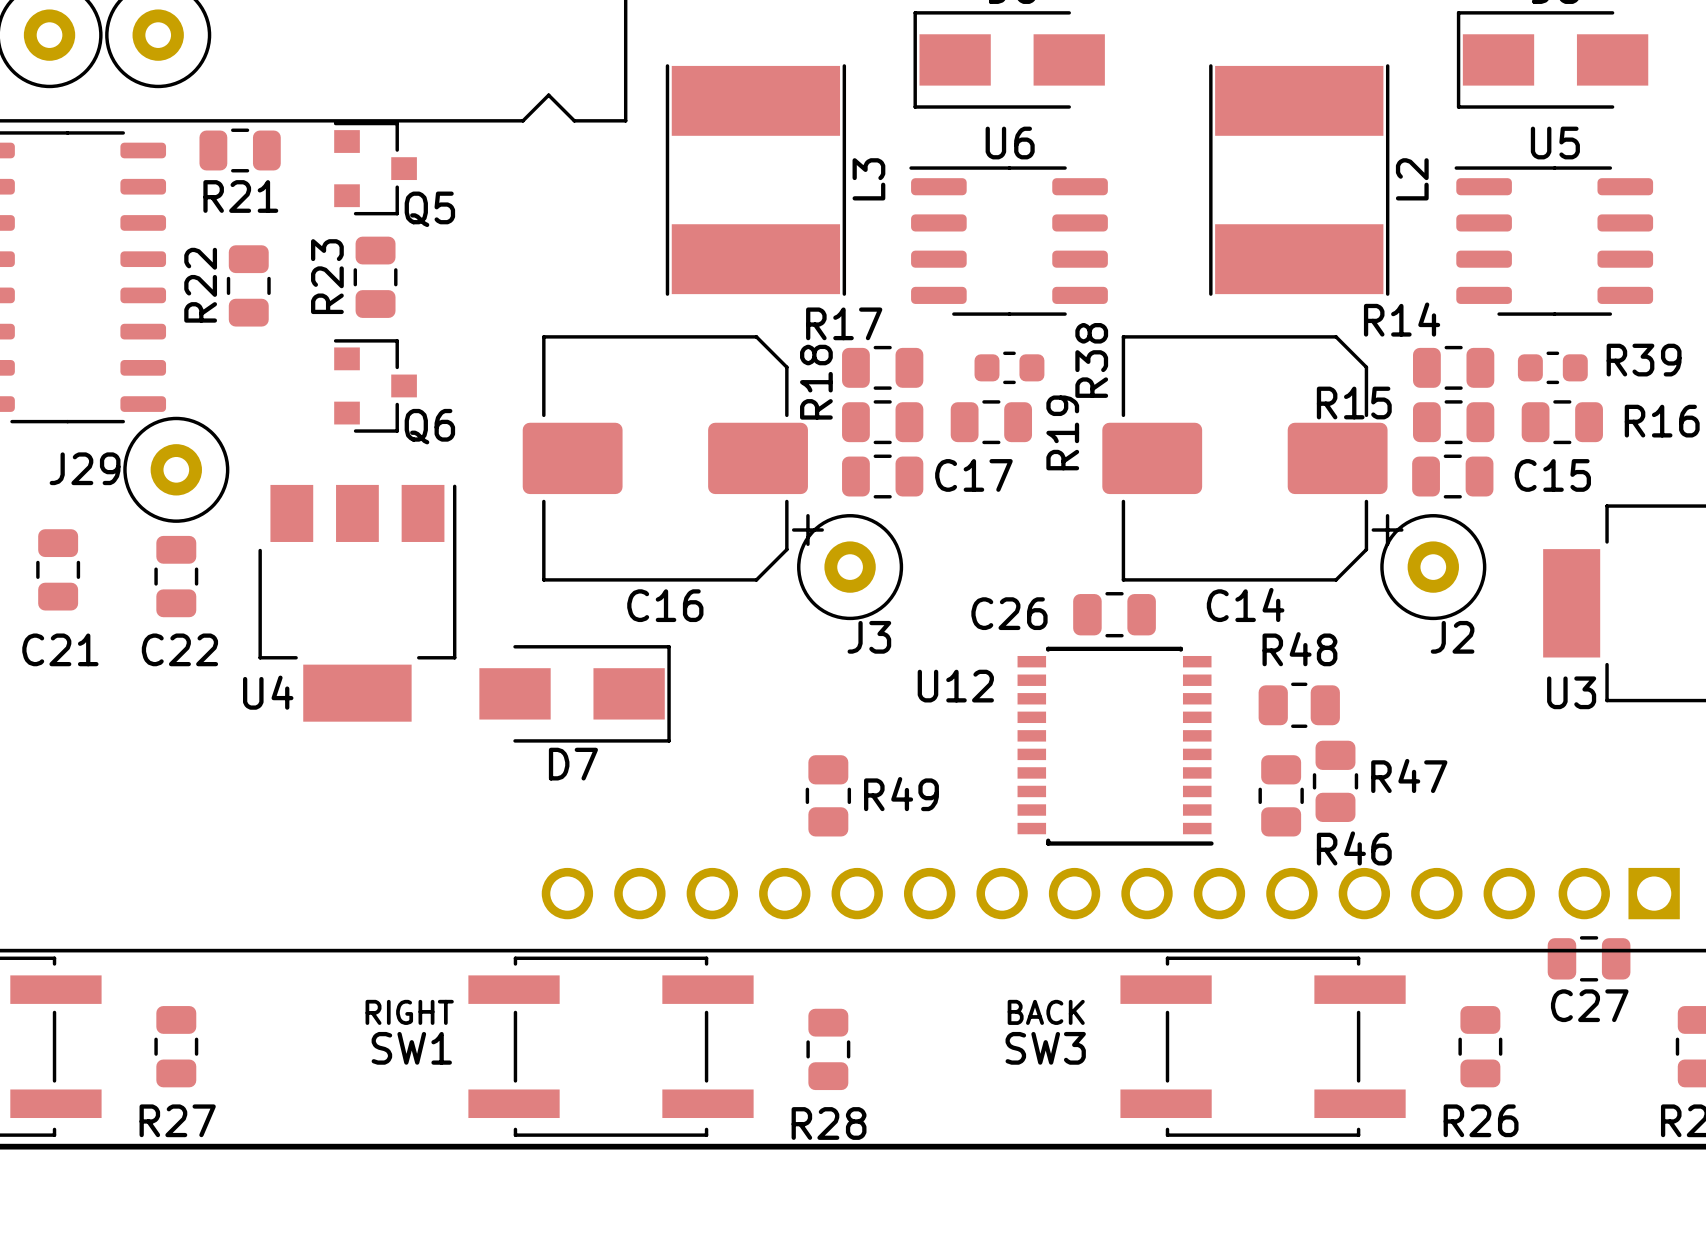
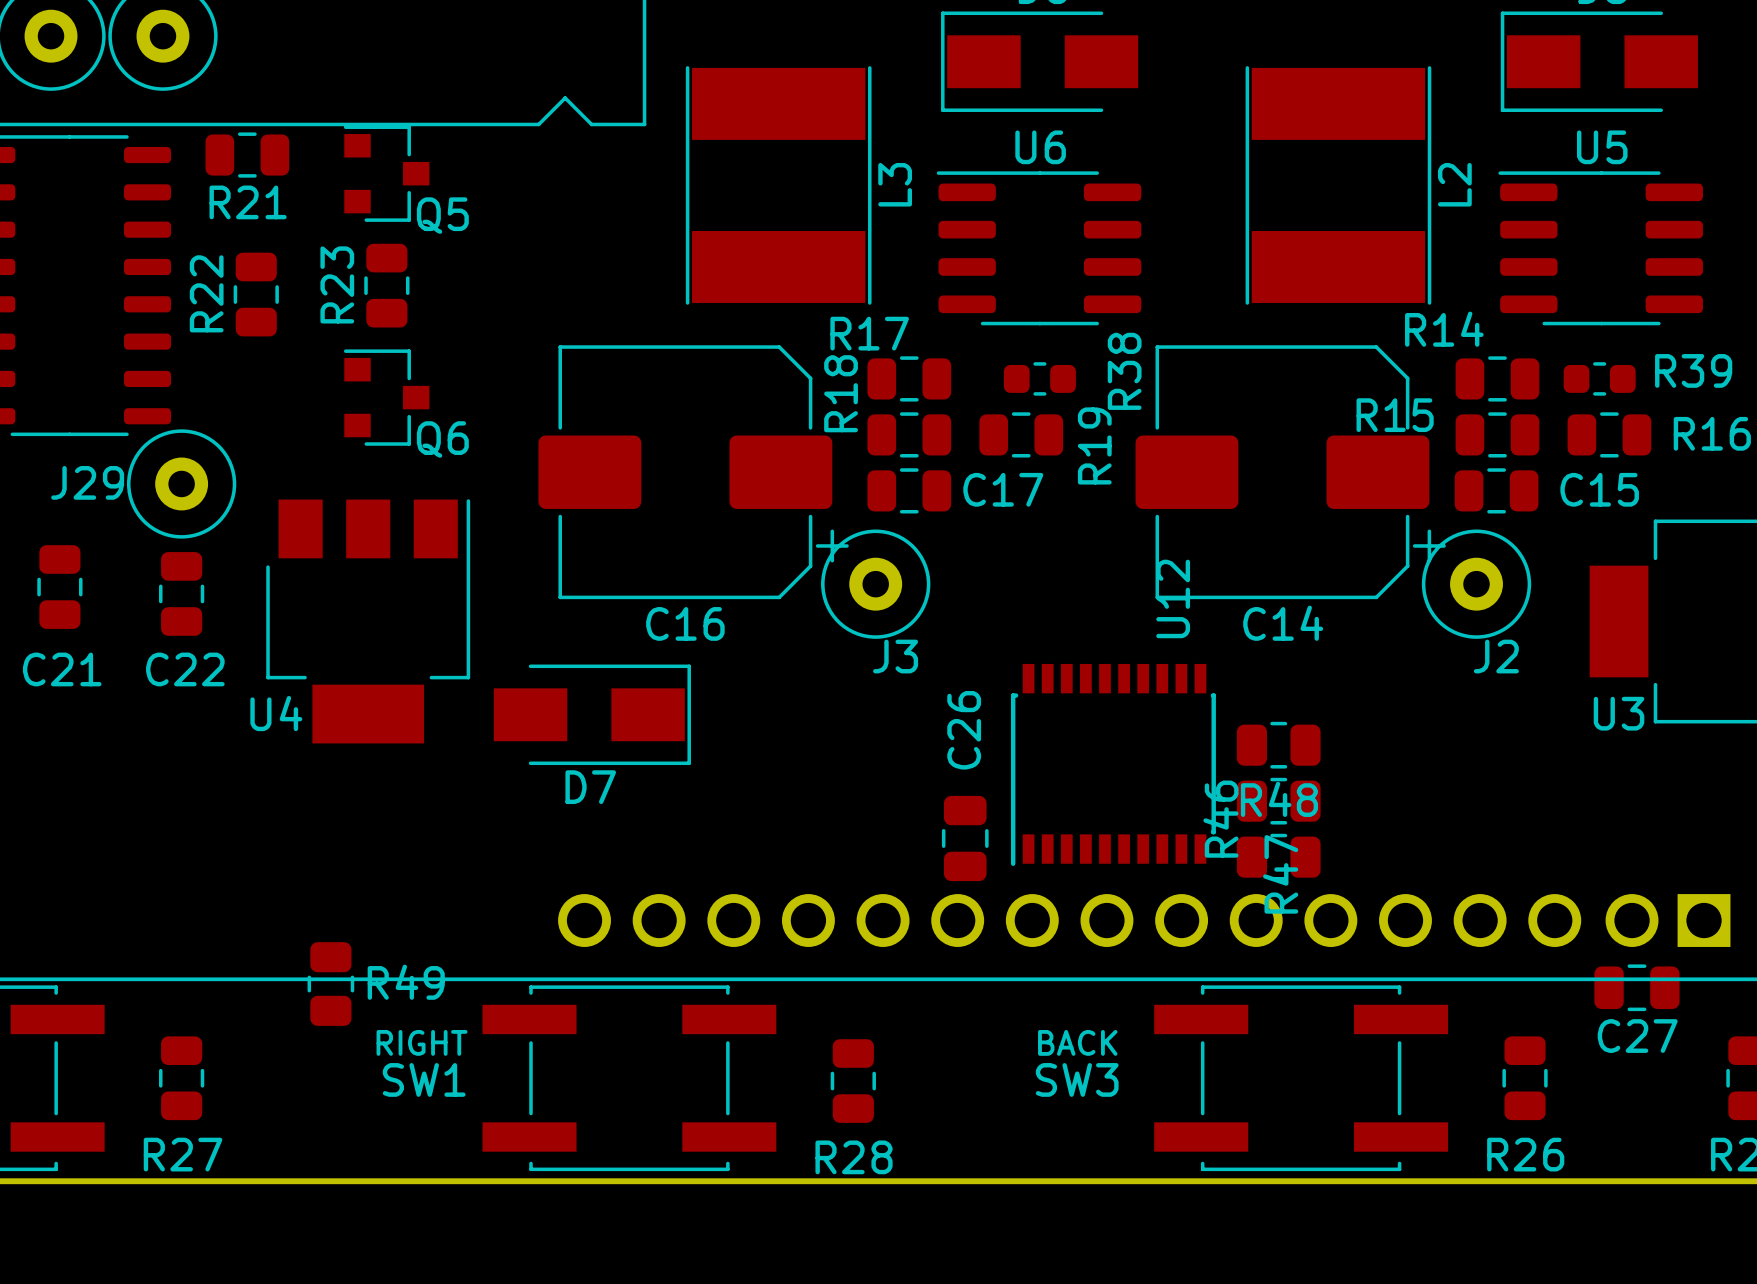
C26 rotation: 0° (1114, 614) -> 90° clockwise (965, 838)
C26 position: (1114, 614) -> (965, 838)
R48 position: (1299, 705) -> (1278, 857)
U12 rotation: 0° (1115, 746) -> 90° clockwise (1113, 764)
R47 rotation: 0° (1335, 781) -> 90° clockwise (1278, 801)
R47 position: (1335, 781) -> (1278, 801)
R49 position: (828, 795) -> (330, 984)
R46 rotation: 0° (1281, 795) -> 90° clockwise (1278, 745)
R46 position: (1281, 795) -> (1278, 745)

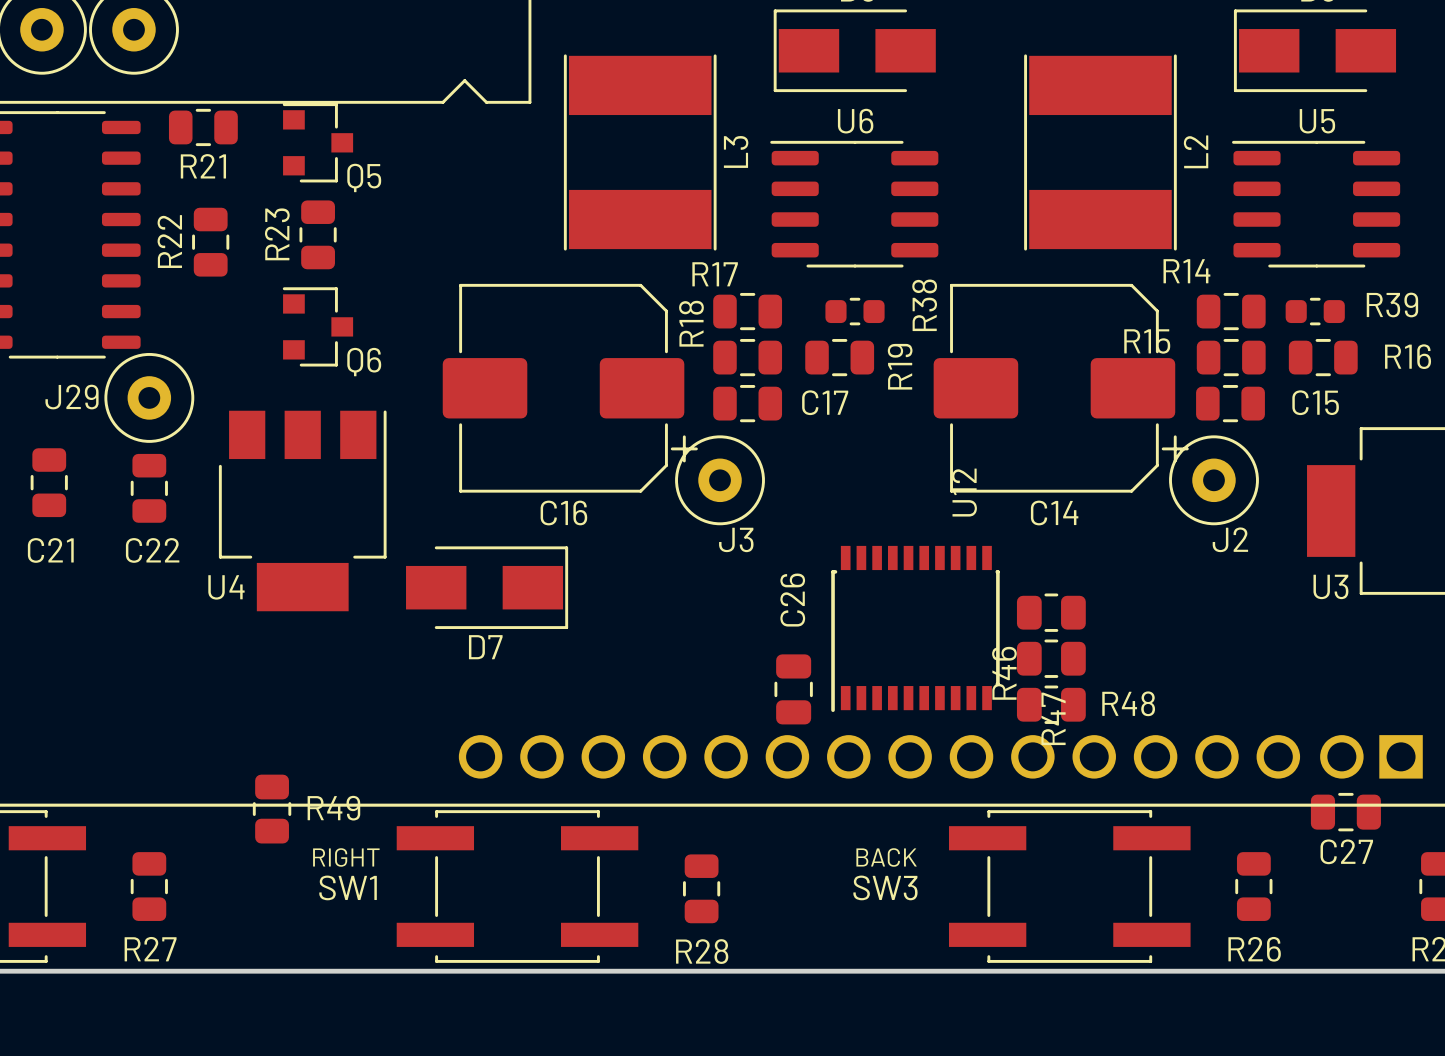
R48 name position: R48 (1279, 799) -> R48 (1128, 703)

